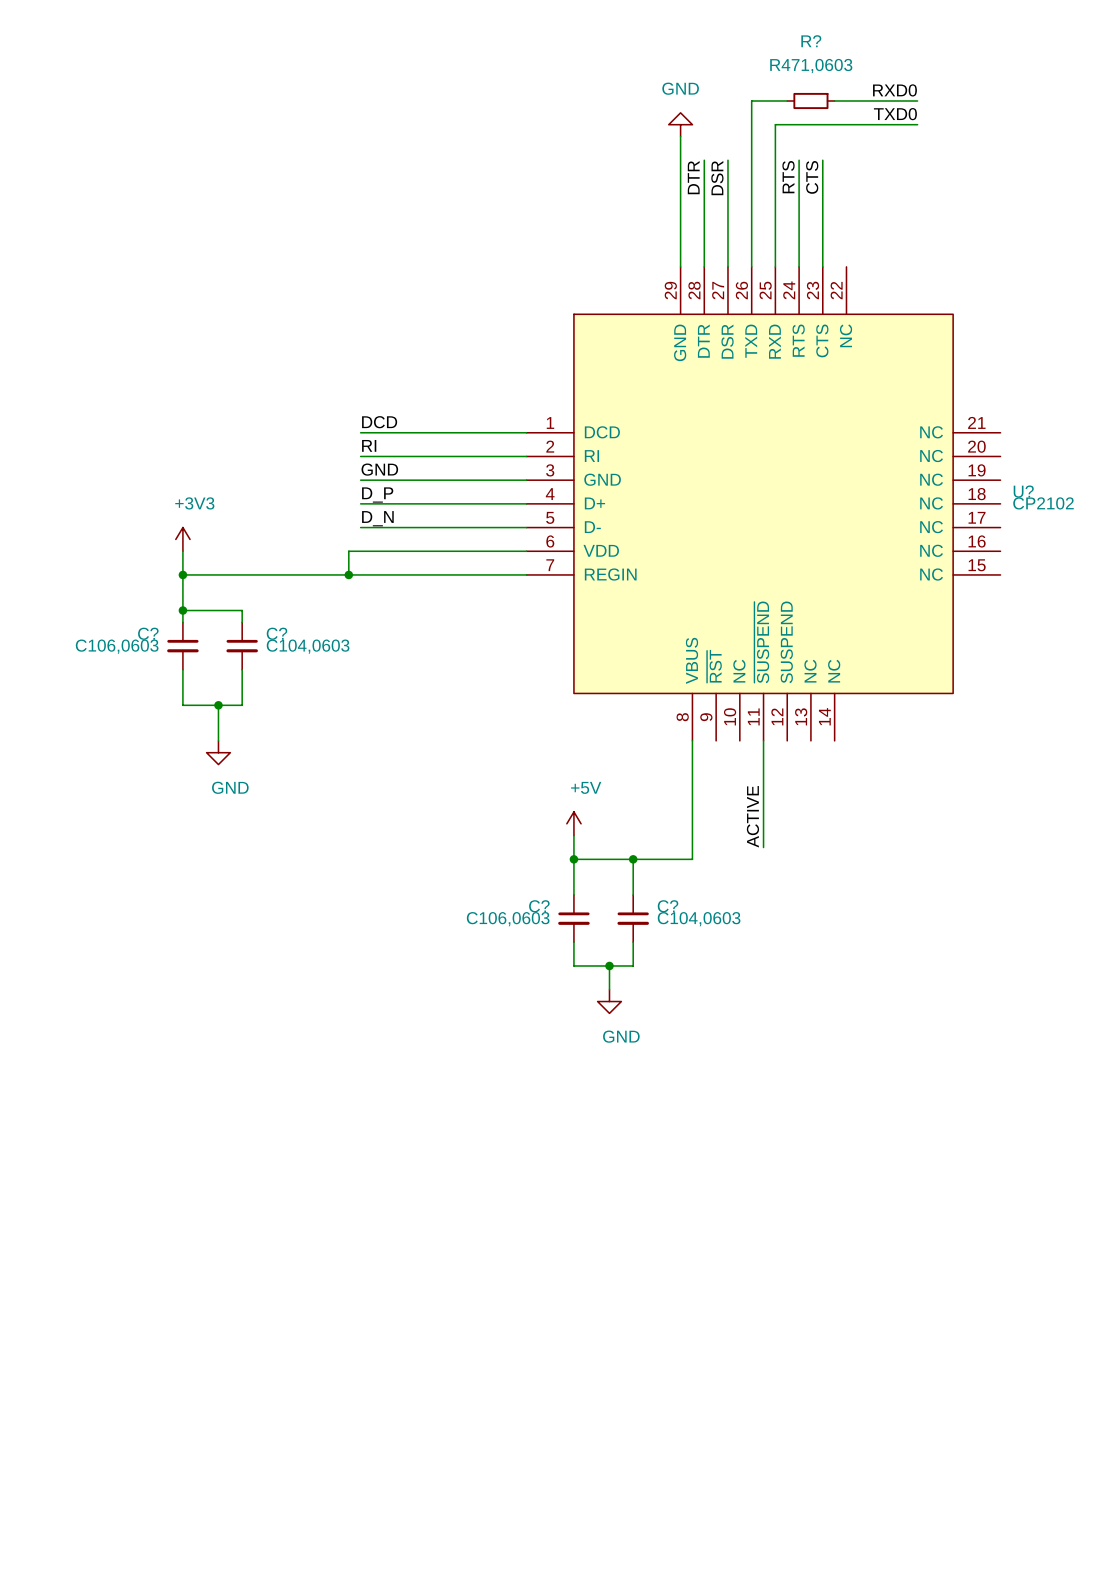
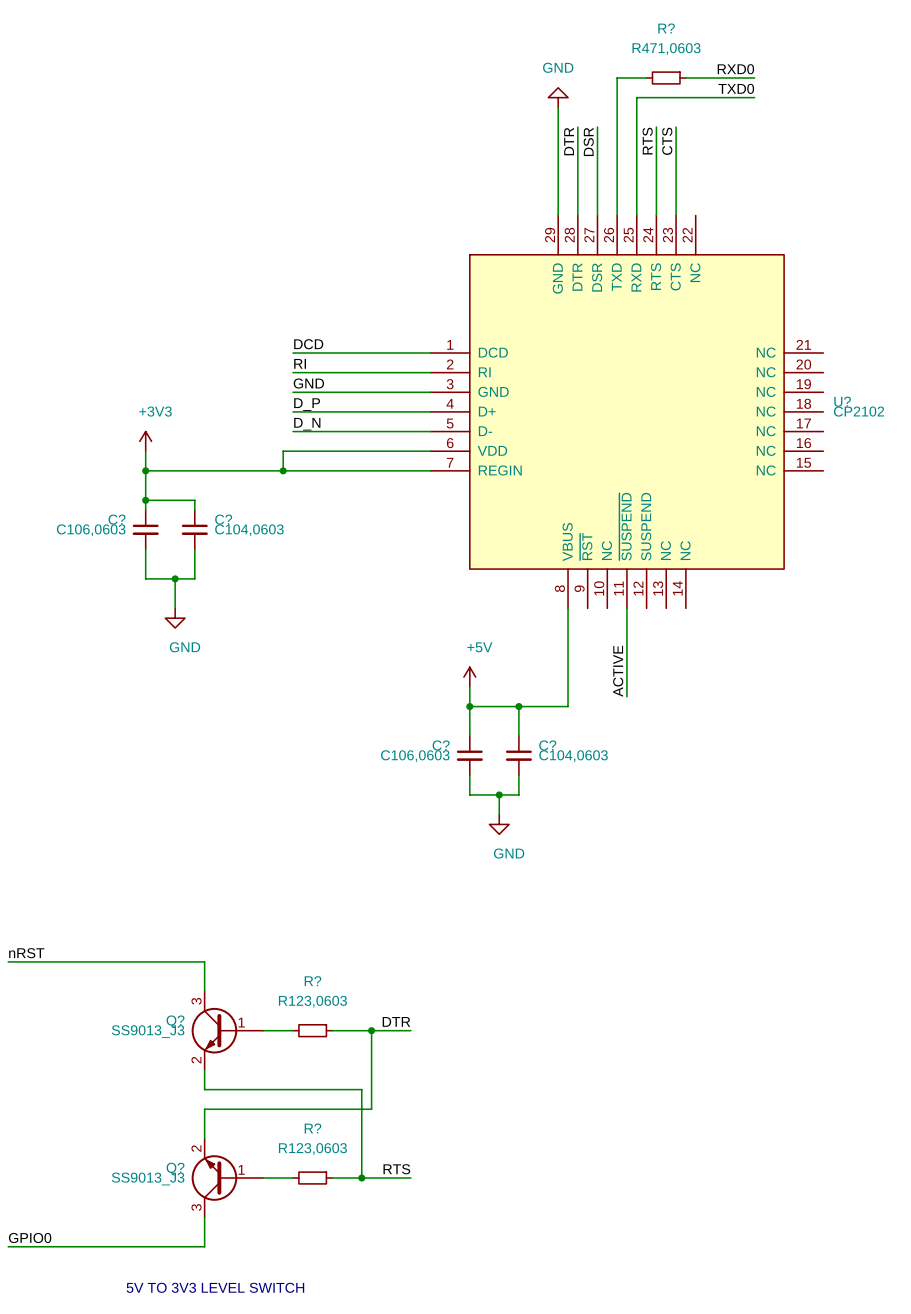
label: none -> nRST (26, 953)
wire: none -> (8, 961) (204, 961) (204, 991)
label: none -> DTR (396, 1021)
Q?: none -> SS9013_J3 (227, 1030)
wire: none -> (263, 1030) (293, 1030)
R?: none -> R123,0603 (312, 1030)
wire: none -> (332, 1030) (410, 1030)
wire: none -> (371, 1030) (371, 1109) (204, 1109) (204, 1138)
junction: none -> (371, 1030)
wire: none -> (204, 1069) (204, 1089) (361, 1089) (361, 1178)
label: none -> RTS (396, 1169)
Q?: none -> SS9013_J3 (227, 1178)
wire: none -> (263, 1178) (293, 1178)
R?: none -> R123,0603 (312, 1178)
wire: none -> (332, 1178) (410, 1178)
junction: none -> (361, 1178)
wire: none -> (204, 1217) (204, 1246) (8, 1246)
label: none -> GPIO0 (30, 1237)
text: none -> 5V TO 3V3 LEVEL SWITCH (215, 1287)

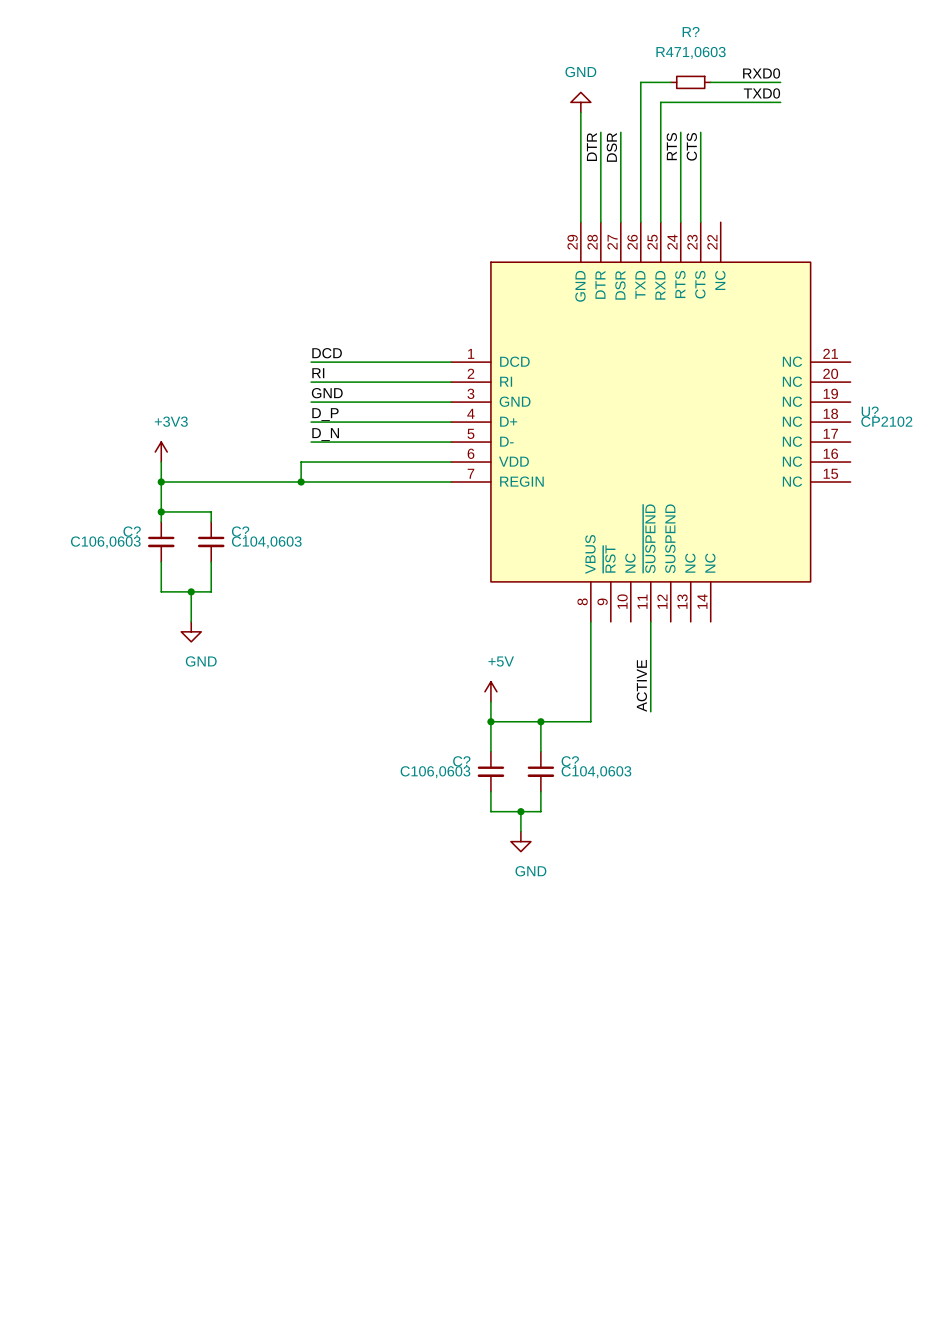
label: nRST (26, 953) -> none
wire: (8, 961) (204, 961) (204, 991) -> none
label: DTR (396, 1021) -> none
Q?: SS9013_J3 (227, 1030) -> none
wire: (263, 1030) (293, 1030) -> none
R?: R123,0603 (312, 1030) -> none
wire: (332, 1030) (410, 1030) -> none
wire: (371, 1030) (371, 1109) (204, 1109) (204, 1138) -> none
junction: (371, 1030) -> none
wire: (204, 1069) (204, 1089) (361, 1089) (361, 1178) -> none
label: RTS (396, 1169) -> none
Q?: SS9013_J3 (227, 1178) -> none
wire: (263, 1178) (293, 1178) -> none
R?: R123,0603 (312, 1178) -> none
wire: (332, 1178) (410, 1178) -> none
junction: (361, 1178) -> none
wire: (204, 1217) (204, 1246) (8, 1246) -> none
label: GPIO0 (30, 1237) -> none
text: 5V TO 3V3 LEVEL SWITCH (215, 1287) -> none

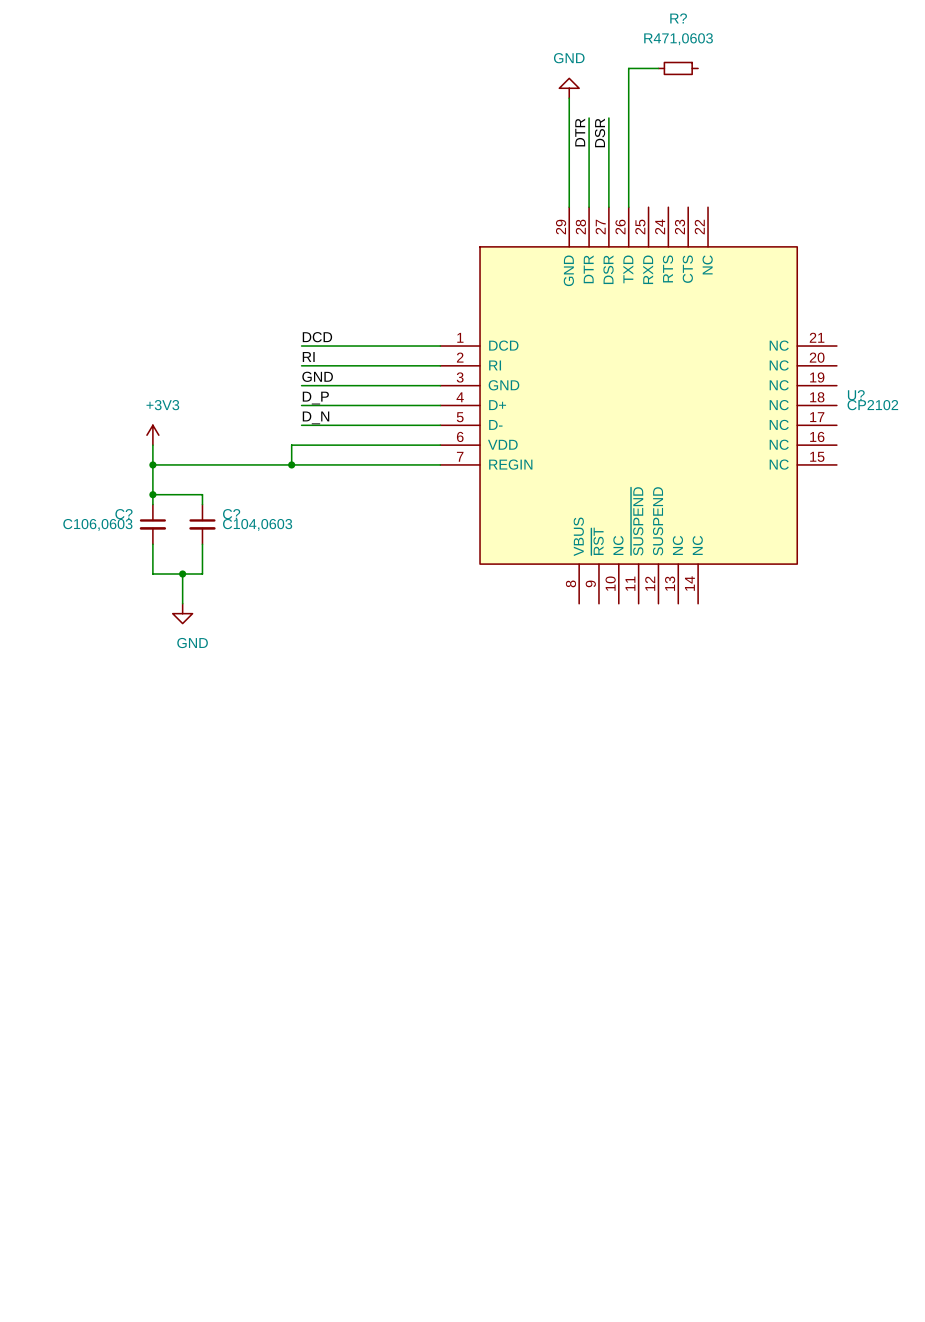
label: RXD0 (761, 73) -> none
wire: (710, 82) (780, 82) -> none
label: TXD0 (761, 93) -> none
wire: (780, 102) (660, 102) (660, 222) -> none
wire: (680, 132) (680, 222) -> none
wire: (700, 132) (700, 222) -> none
label: RTS (671, 146) -> none
label: CTS (691, 146) -> none
wire: (590, 621) (590, 721) (490, 721) -> none
wire: (650, 621) (650, 711) -> none
label: ACTIVE (641, 685) -> none
power symbol: +5V (490, 691) -> none
wire: (490, 701) (490, 751) -> none
junction: (490, 721) -> none
wire: (540, 721) (540, 751) -> none
junction: (540, 721) -> none
C?: C106,0603 (490, 771) -> none
C?: C104,0603 (540, 771) -> none
wire: (490, 791) (490, 811) (540, 811) (540, 791) -> none
wire: (520, 811) (520, 831) -> none
junction: (520, 811) -> none
power symbol: GND (520, 841) -> none

